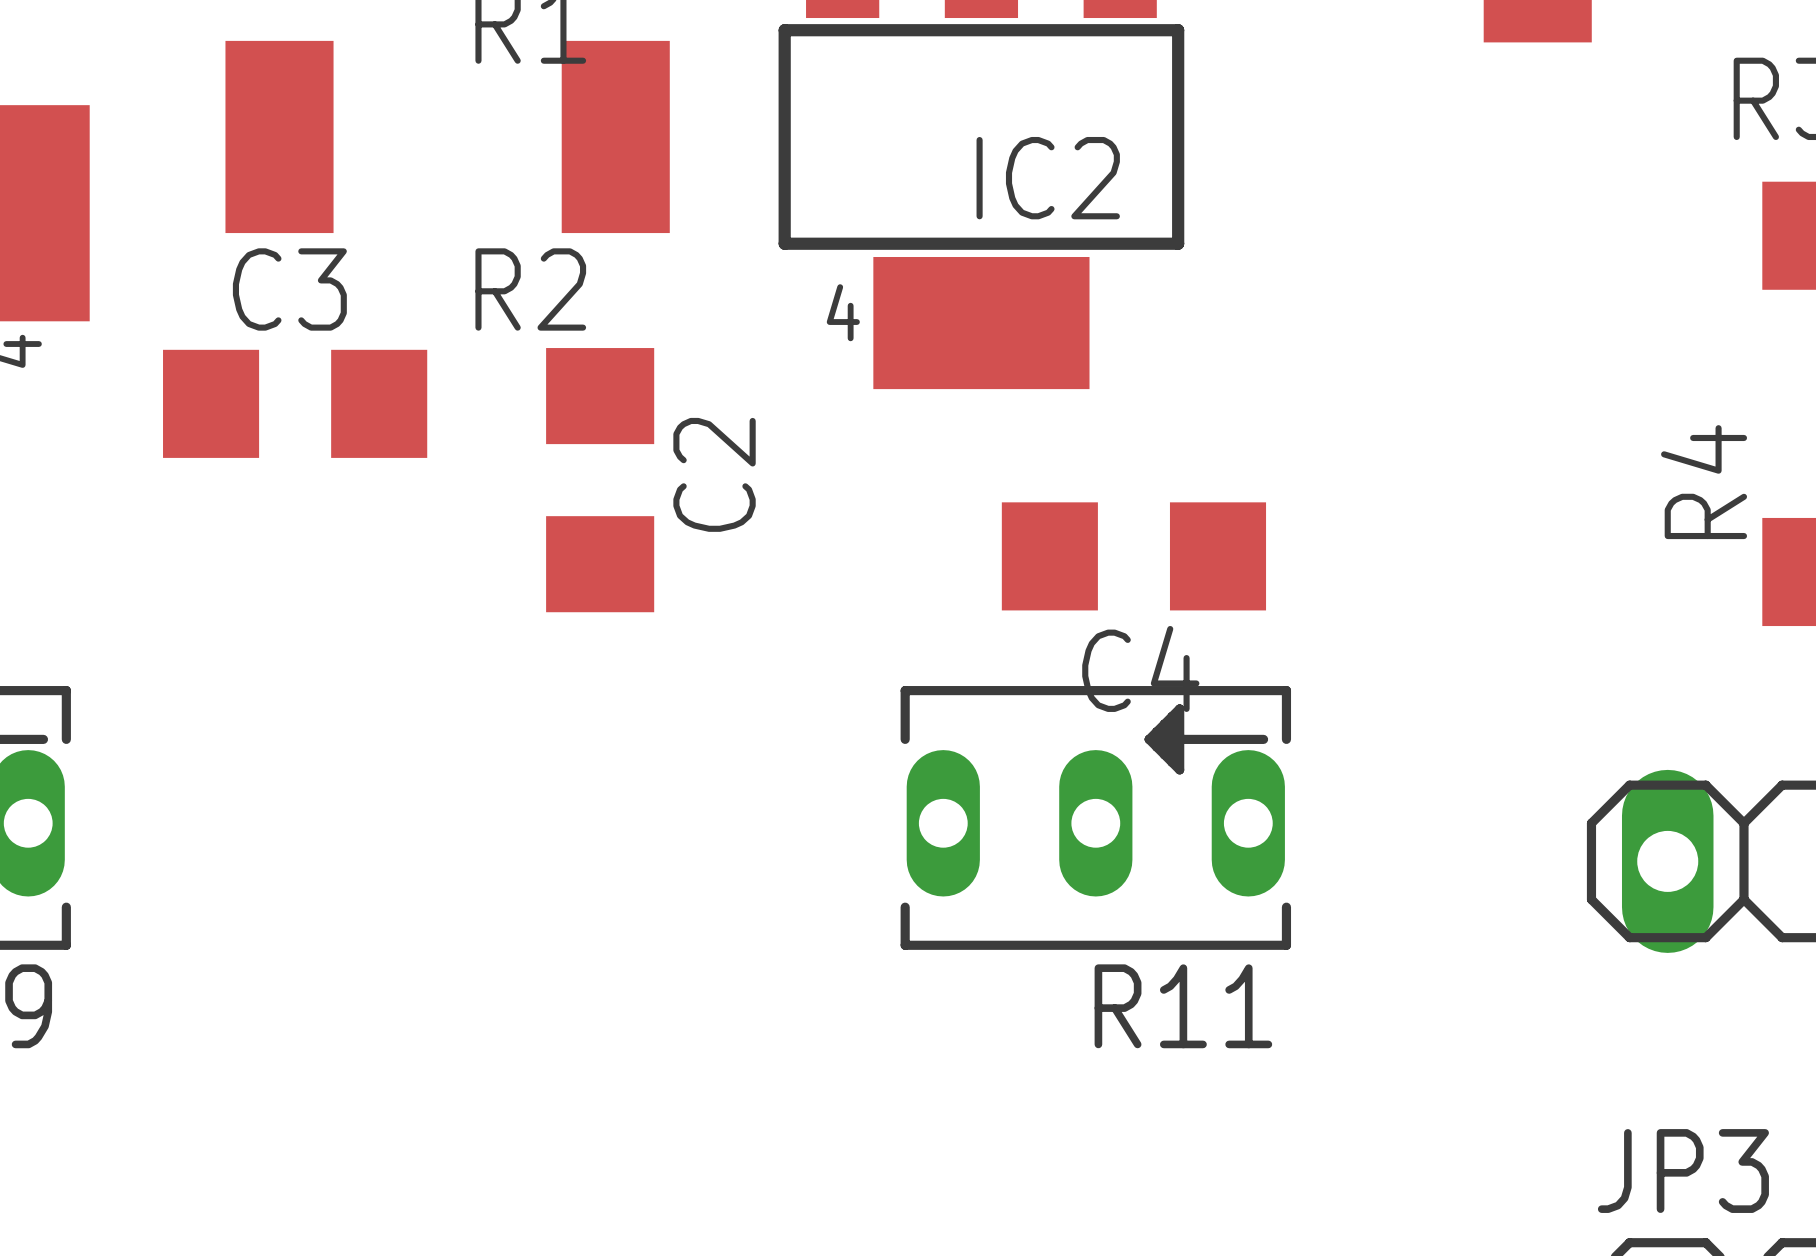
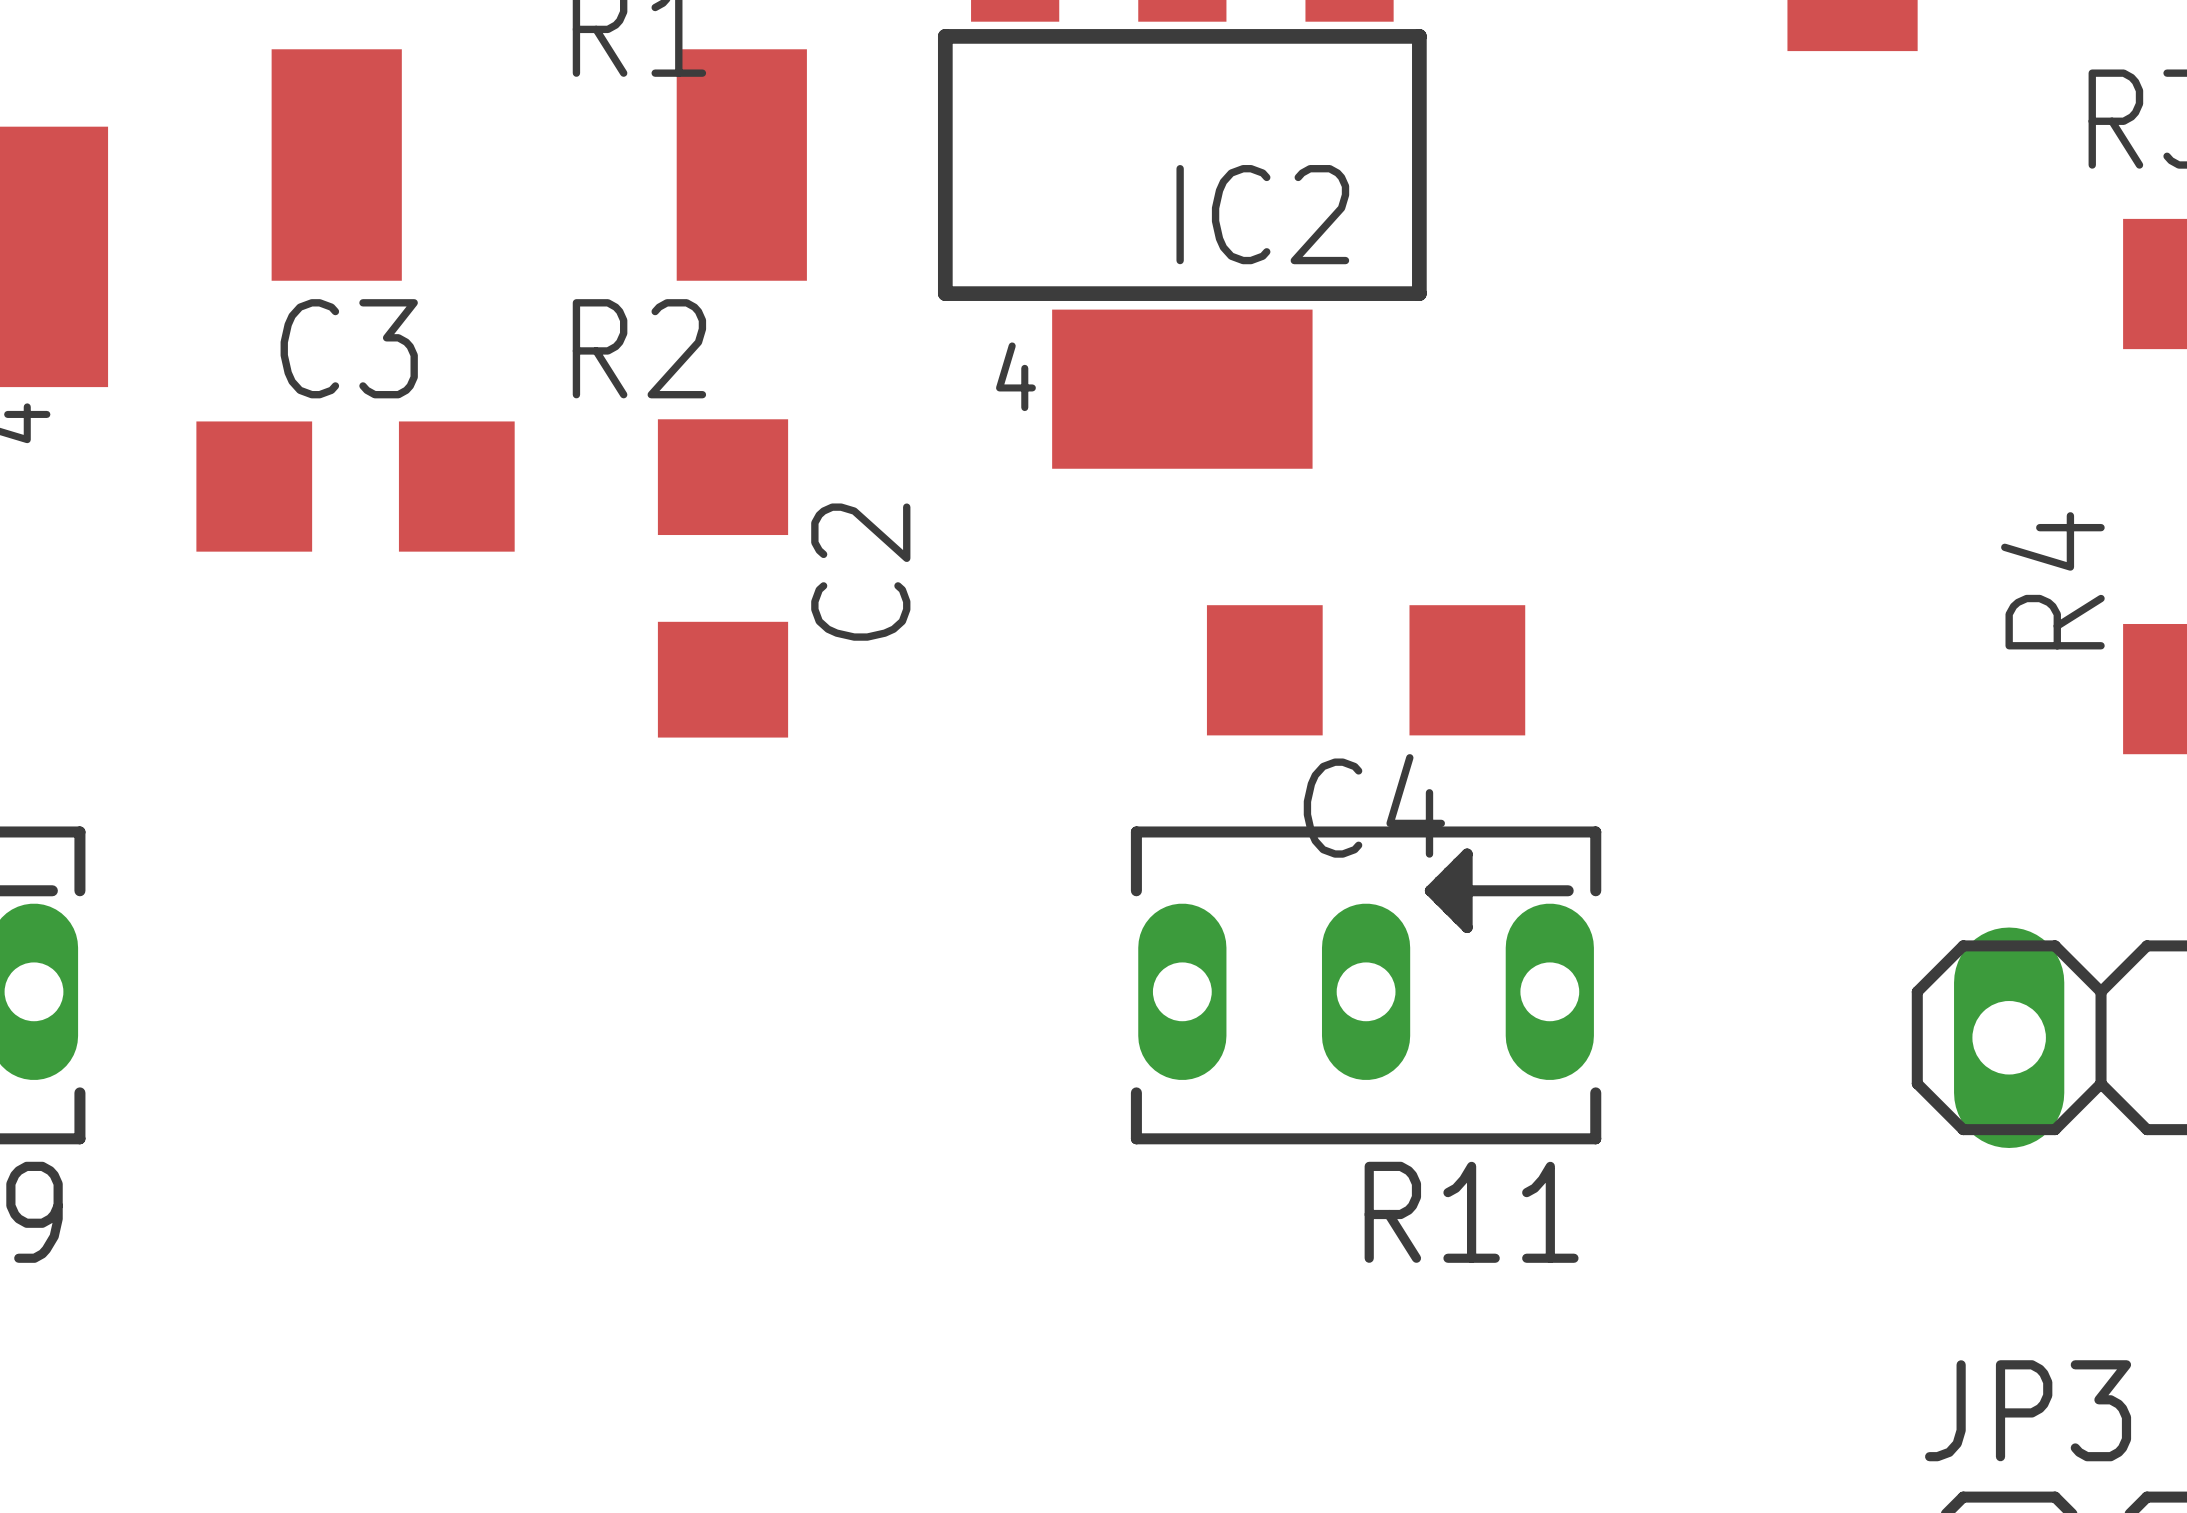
R11 position: (1095, 817) -> (1366, 985)

